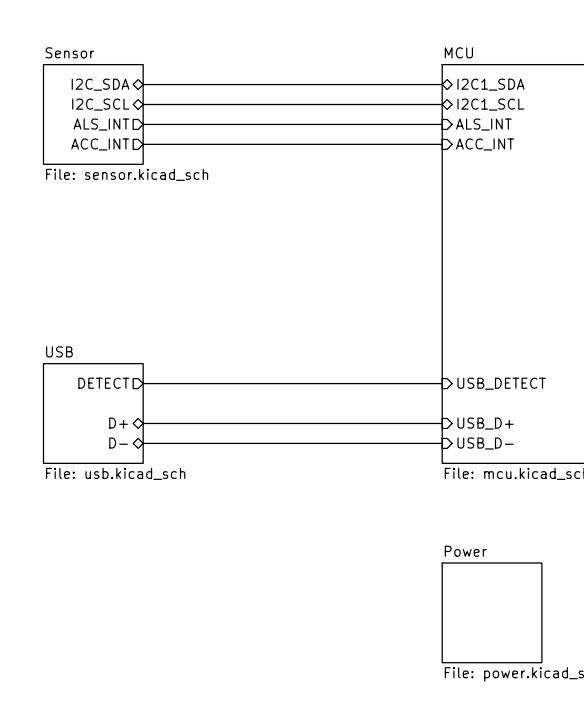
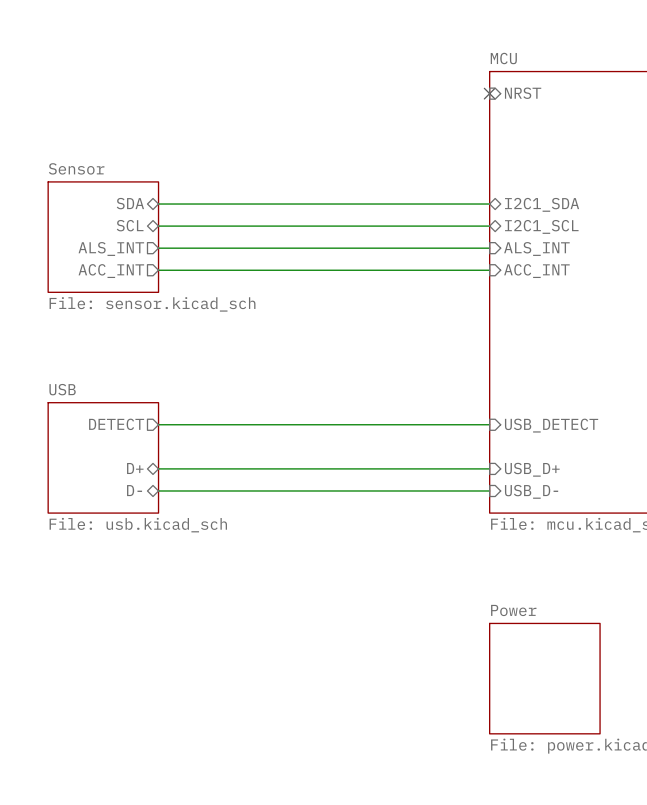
sheet pin: I2C_SDA (100, 84) -> none
wire: (143, 84) (442, 84) -> (158, 204) (489, 204)
no-connect mark: none -> (489, 93)
sheet pin shape: bidirectional (491, 84) -> input (523, 93)
sheet pin: I2C1_SDA (491, 84) -> NRST (523, 93)
sheet pin: I2C_SCL (100, 104) -> none
wire: (143, 104) (442, 104) -> (158, 226) (489, 226)
sheet pin position: I2C1_SCL (490, 104) -> I2C1_SCL (541, 226)
sheet Sensor position: (93, 114) -> (103, 237)
sheet pin position: ALS_INT (101, 124) -> ALS_INT (111, 248)
wire: (143, 124) (442, 124) -> (158, 248) (489, 248)
sheet pin position: ALS_INT (483, 124) -> ALS_INT (536, 248)
sheet pin position: ACC_INT (100, 144) -> ACC_INT (111, 271)
wire: (143, 144) (442, 144) -> (158, 270) (489, 270)
sheet pin position: ACC_INT (485, 144) -> ACC_INT (536, 271)
sheet pin: none -> SDA (130, 203)
sheet pin: none -> I2C1_SDA (542, 204)
sheet pin: none -> SCL (130, 225)

